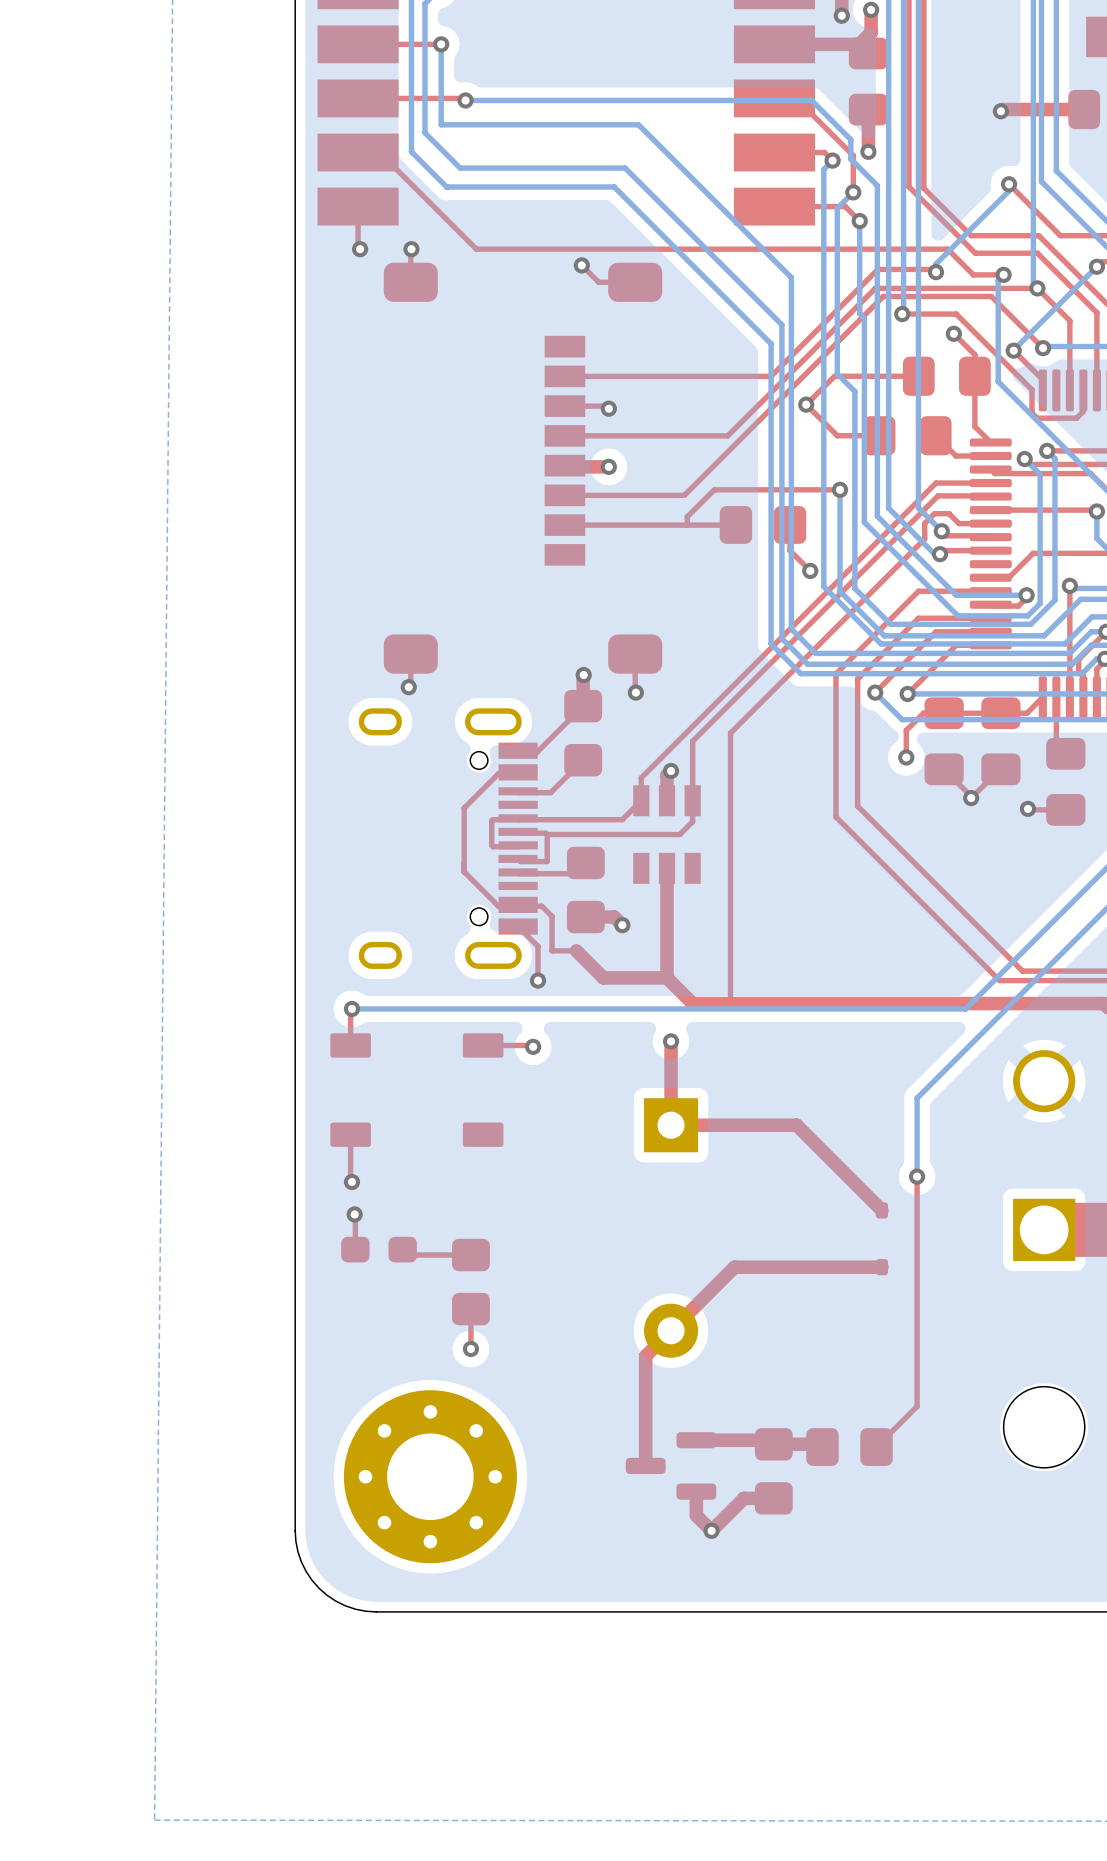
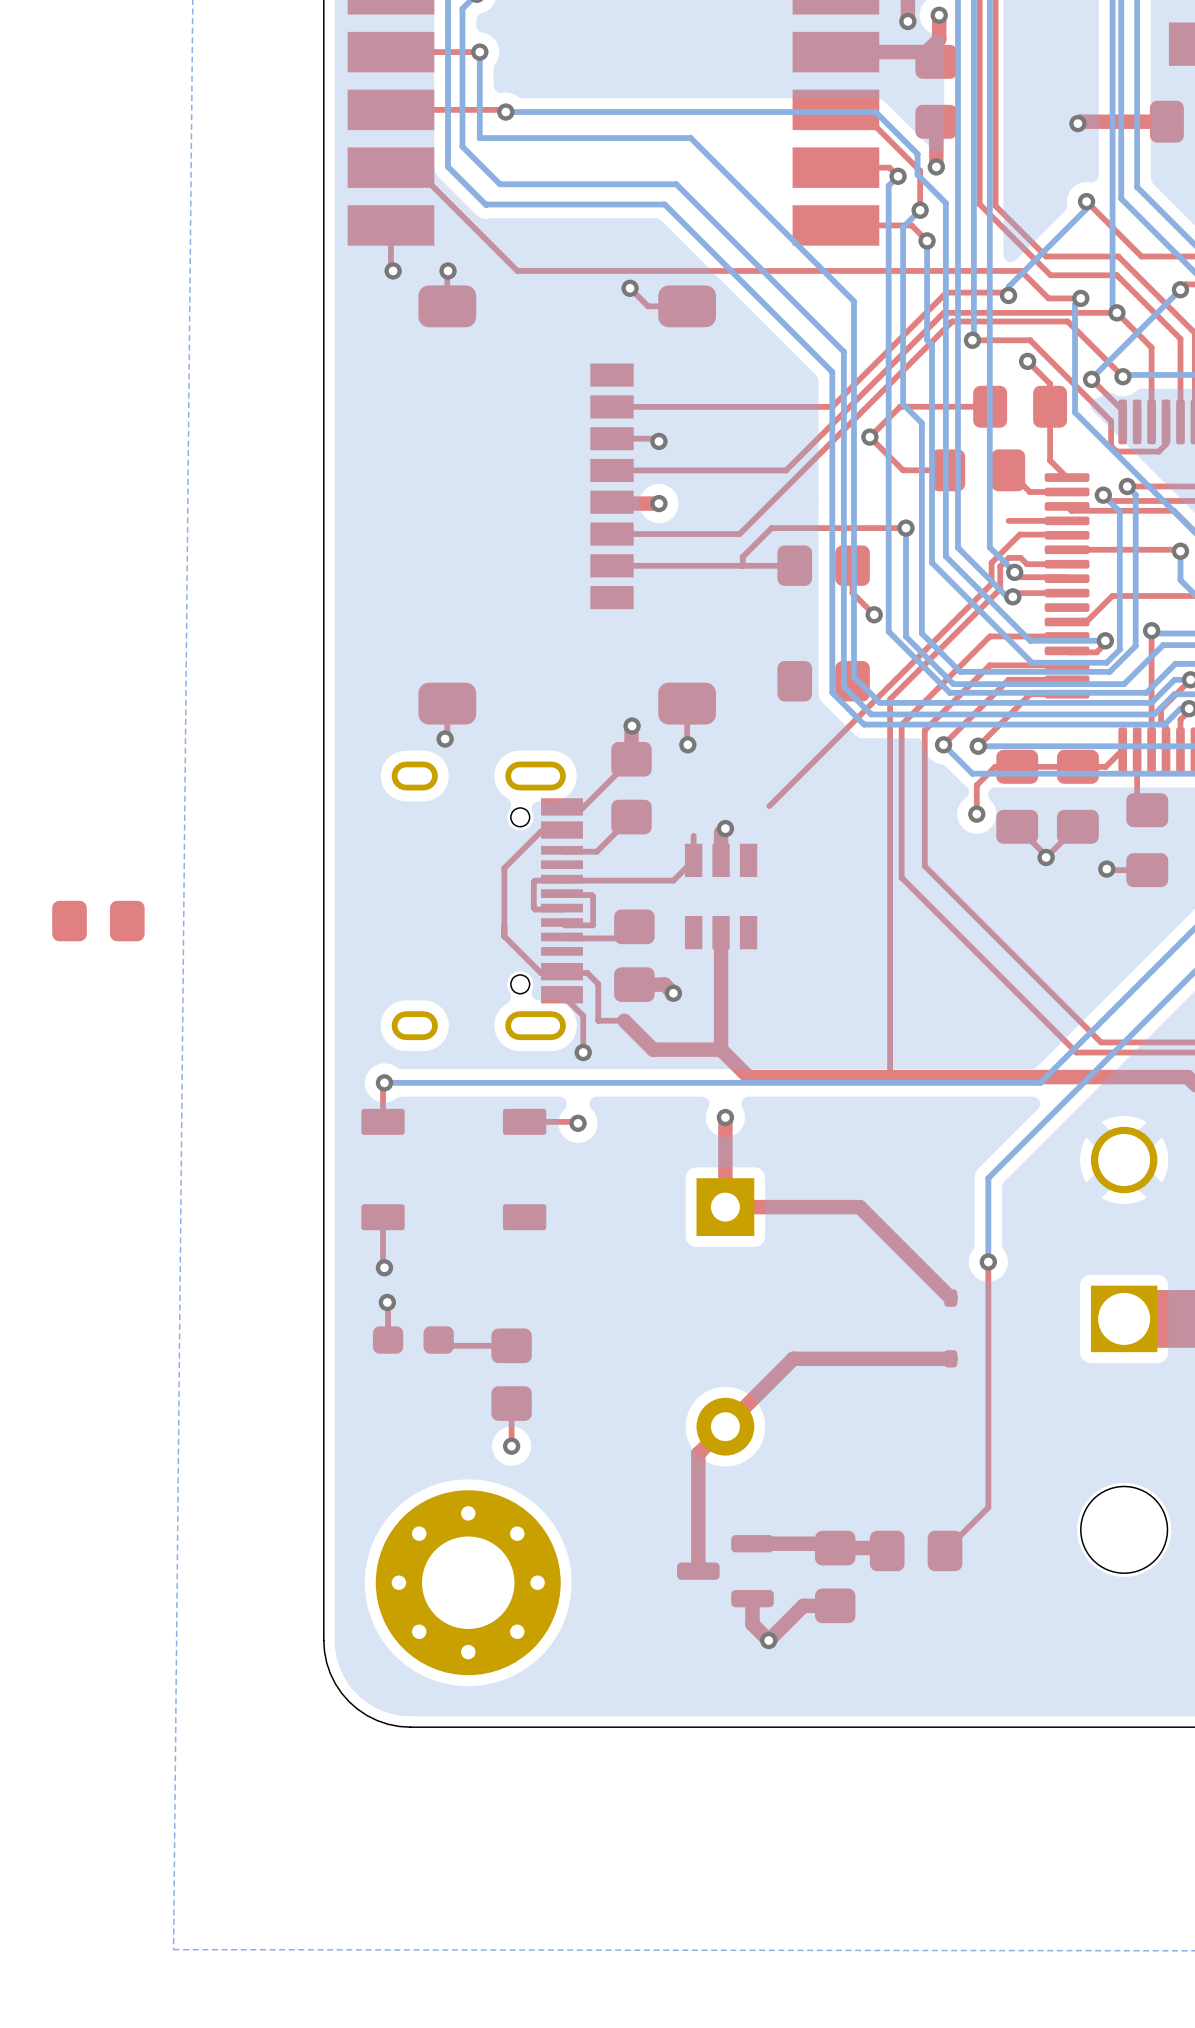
top track: (936, 483) (641, 777) -> none
top track: (946, 495) (938, 495) (692, 741) (692, 821) (679, 834) (547, 834) -> (1019, 534) (991, 562) (991, 583) (769, 806)
top track: (959, 523) (949, 513) (934, 513) (924, 523) (924, 539) (730, 733) (730, 1003) -> (1033, 564) (1027, 564) (1020, 557) (1008, 557) (1000, 566) (1000, 589) (890, 699) (890, 1077) (788, 1077)
part: none -> (823, 681)
part: none -> (98, 921)

